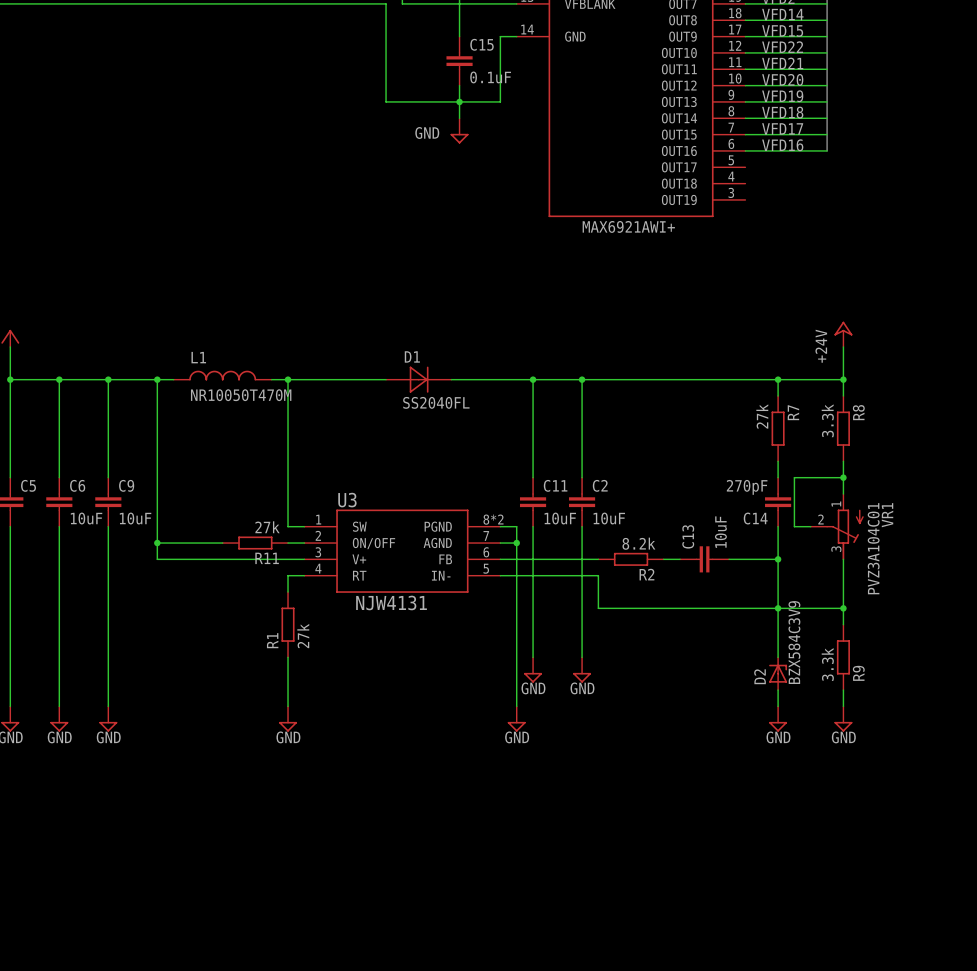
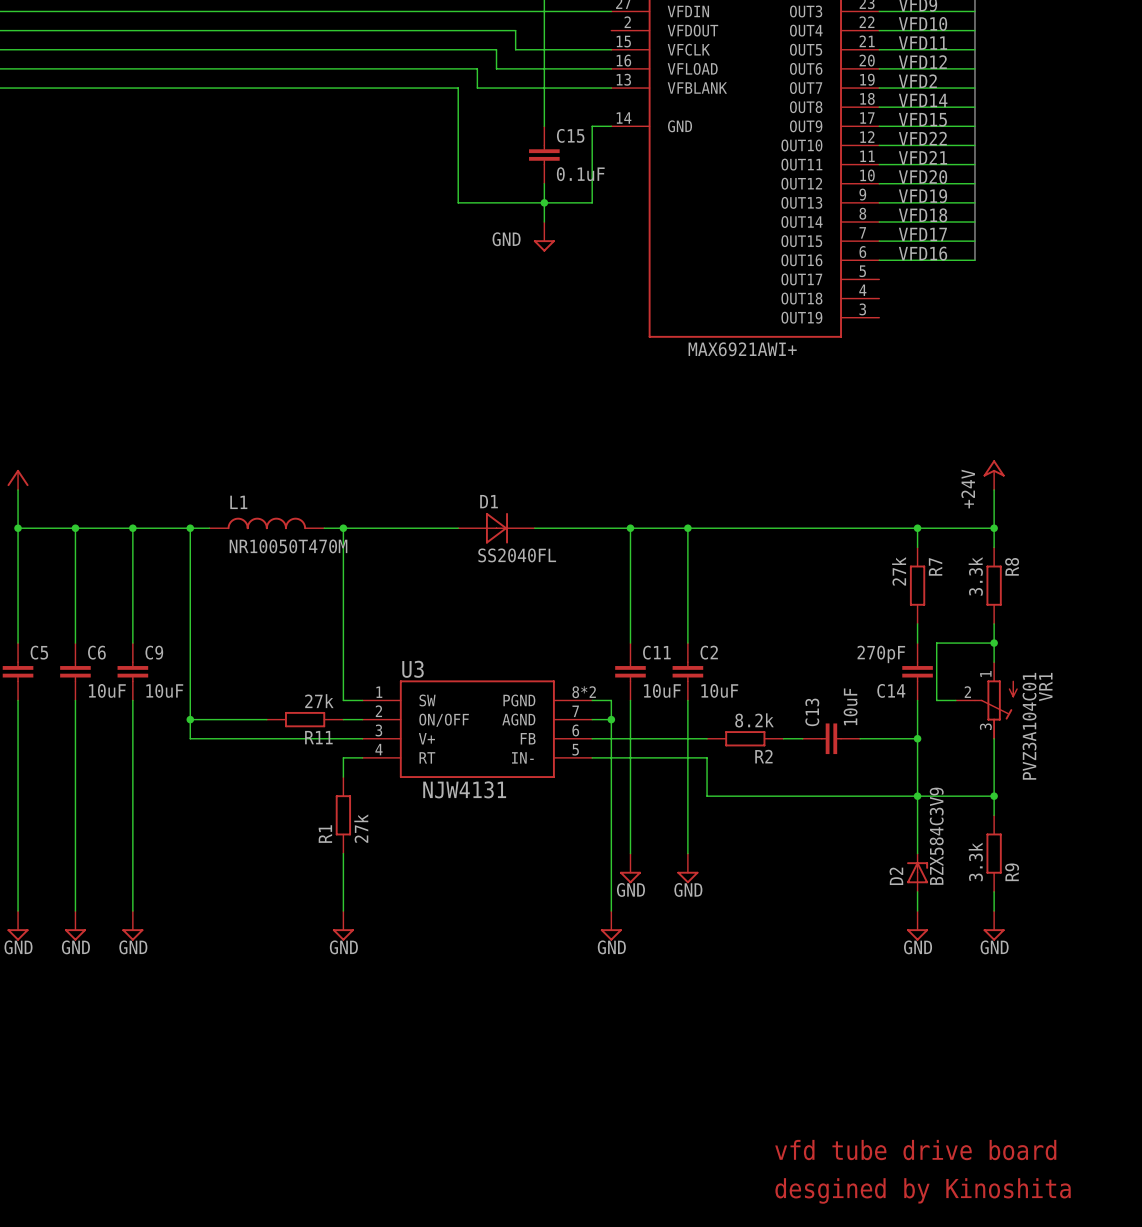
text: none -> vfd tube drive board (915, 1150)
text: none -> desgined by Kinoshita (923, 1190)

